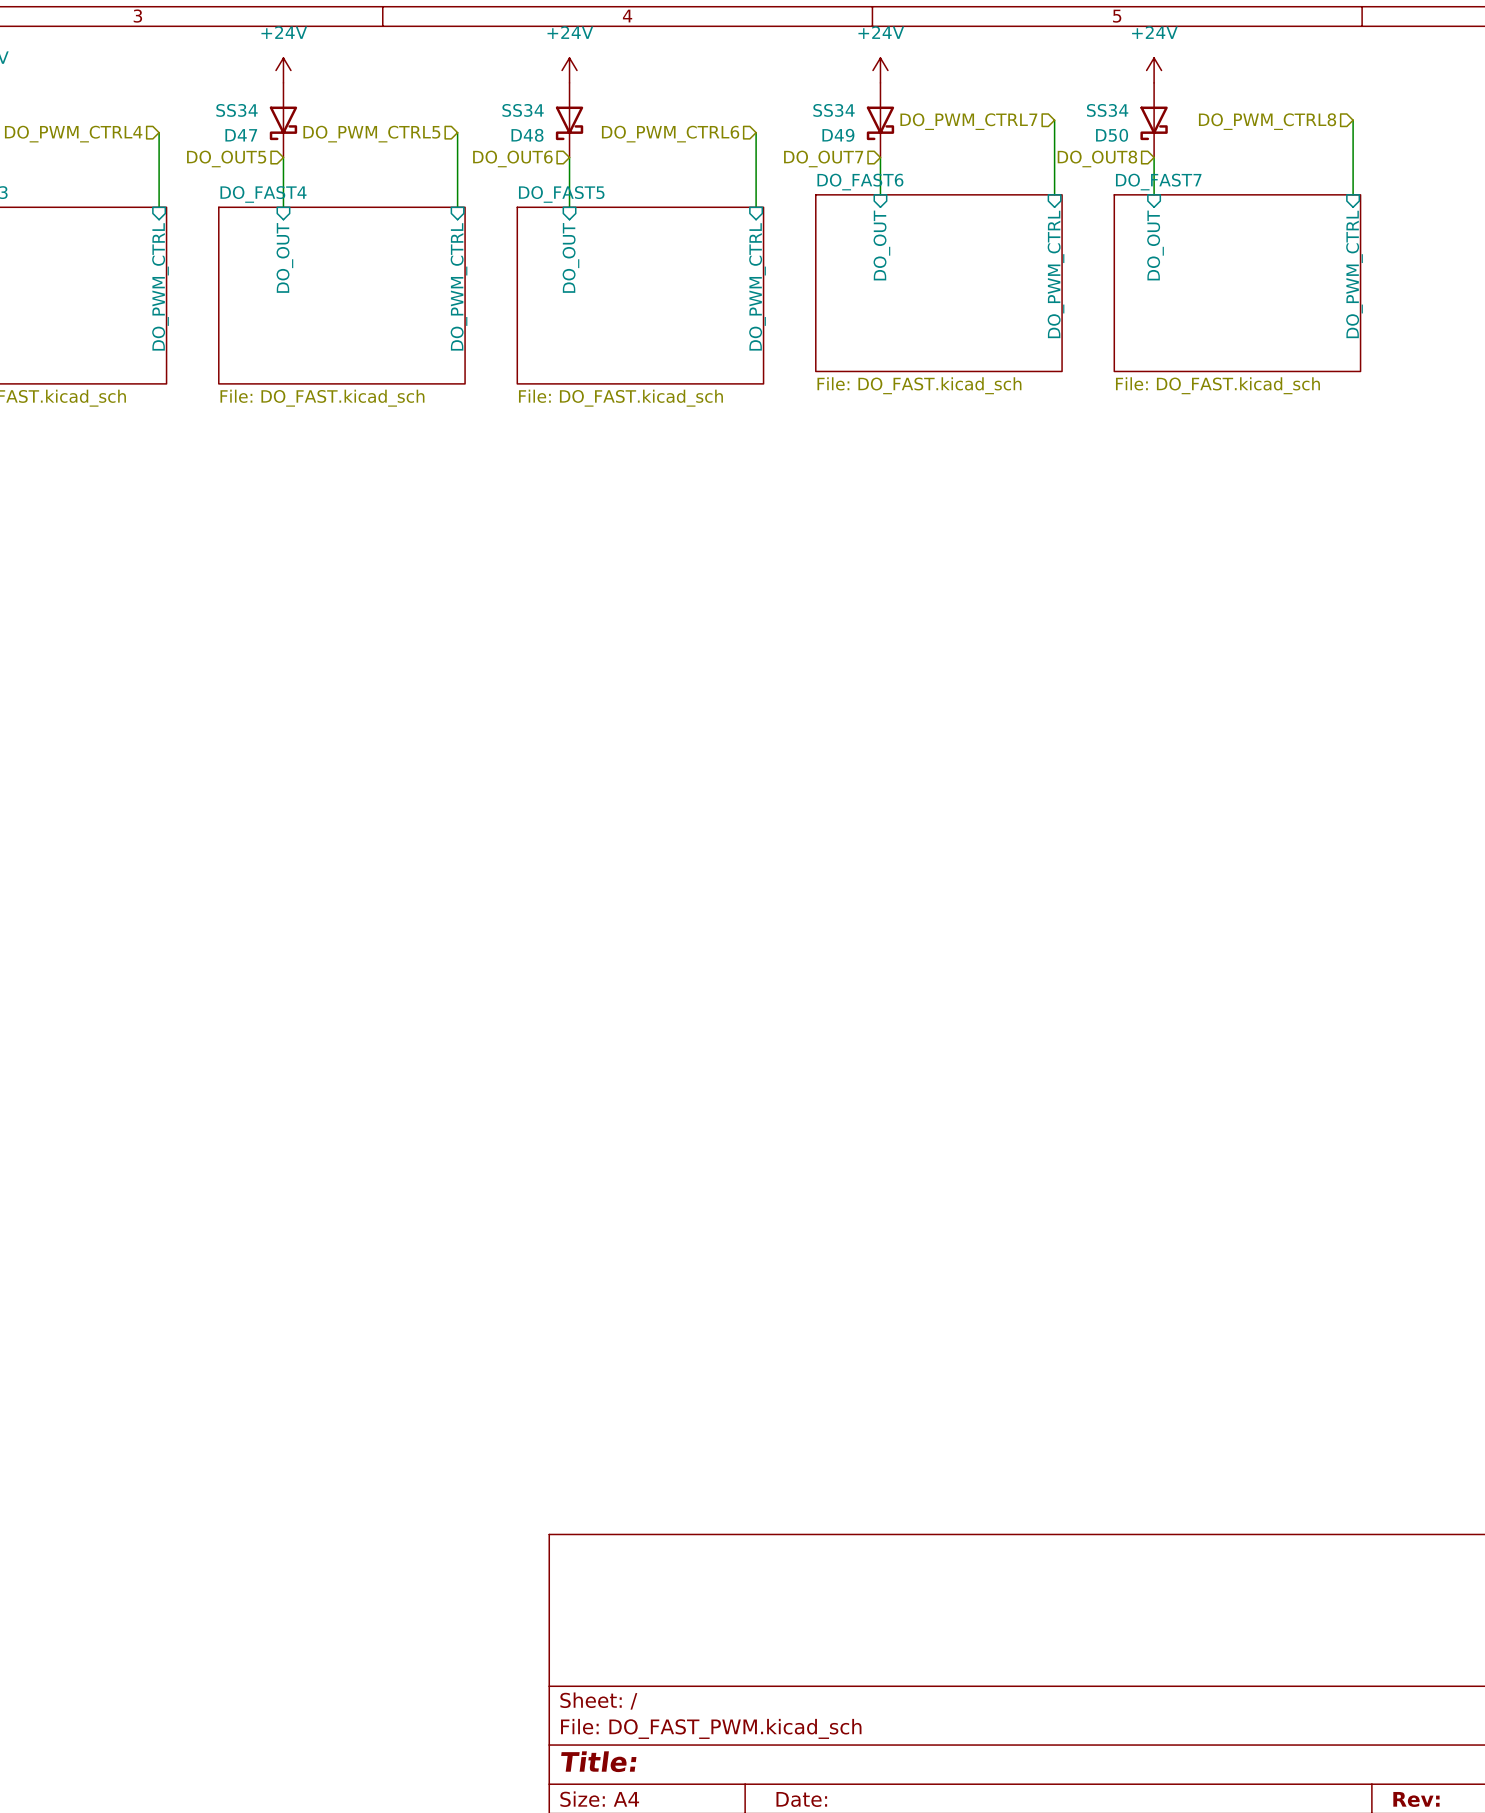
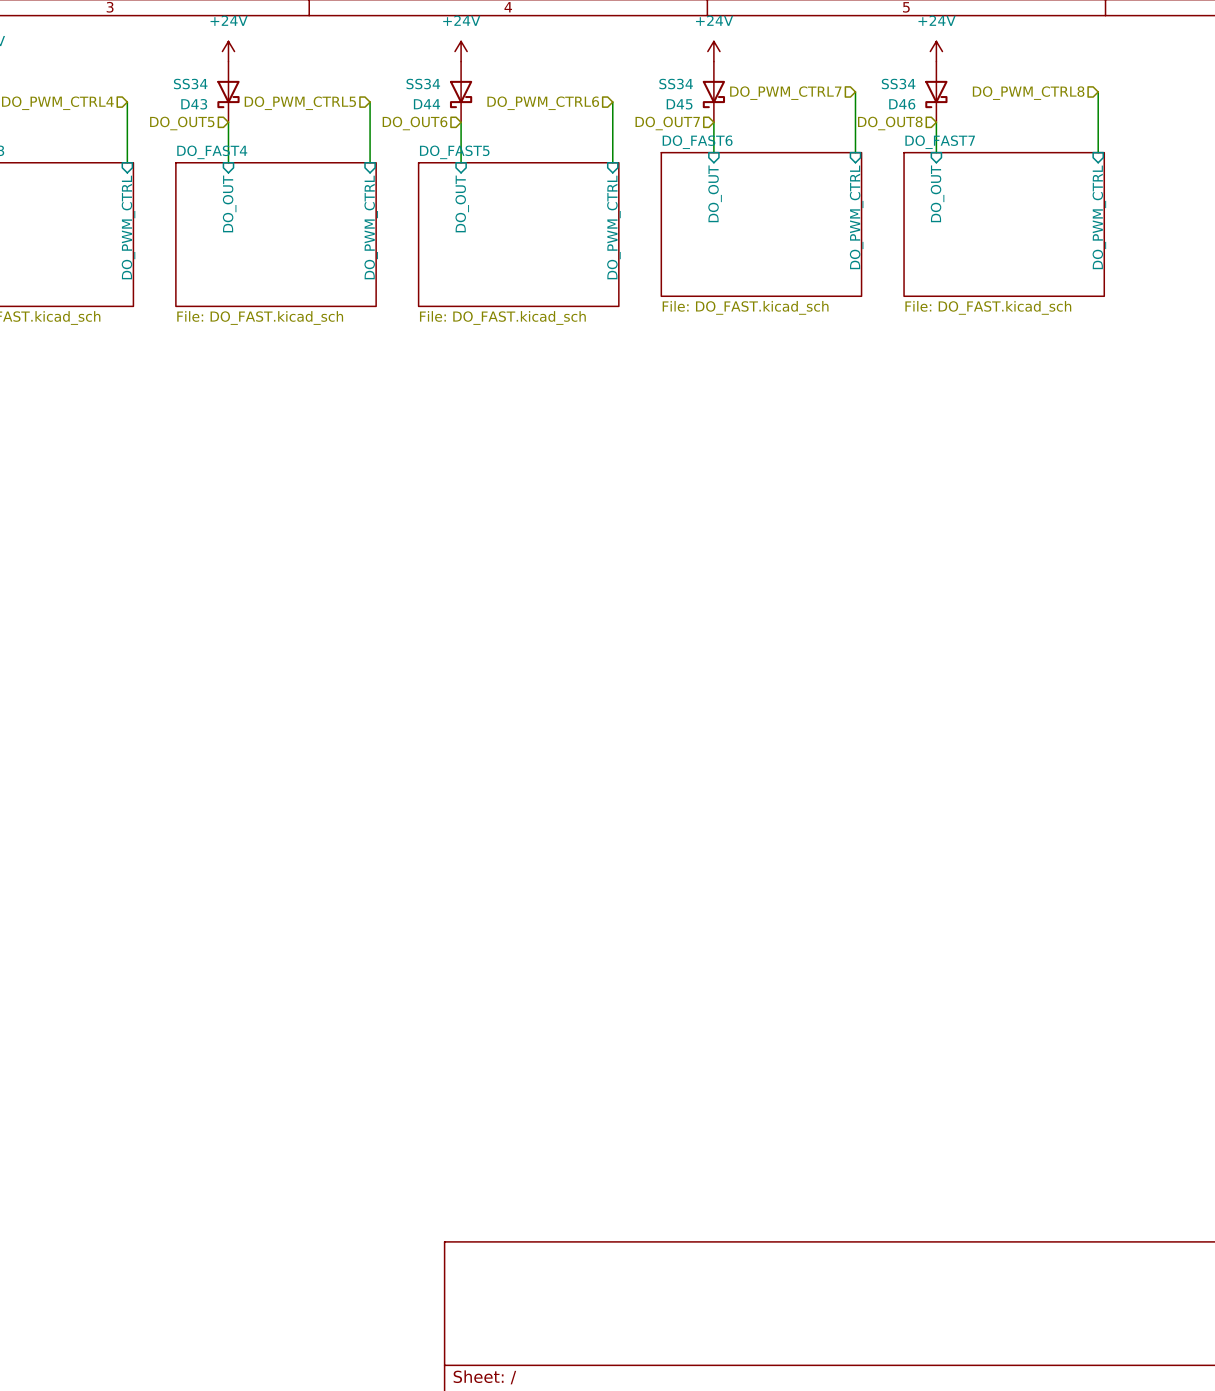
D47 name: D47 (241, 135) -> D43 (194, 104)
D48 name: D48 (527, 135) -> D44 (426, 104)
D49 name: D49 (838, 135) -> D45 (679, 104)
D50 name: D50 (1112, 135) -> D46 (902, 104)

